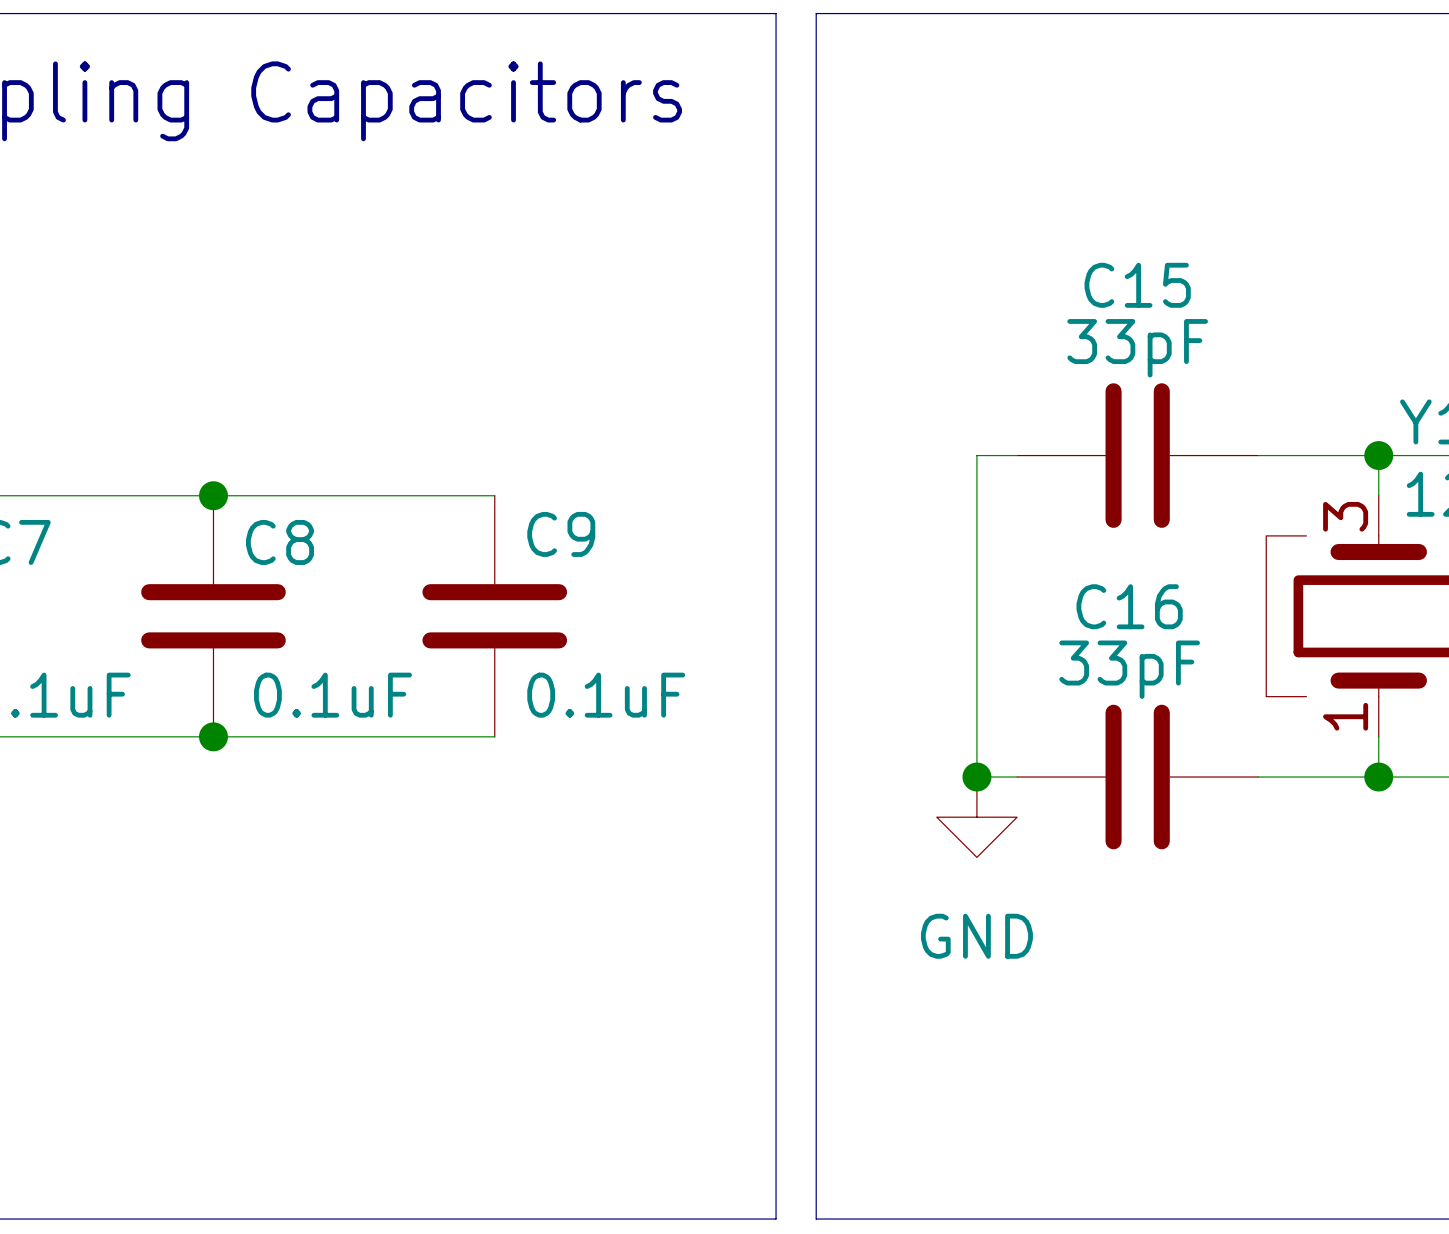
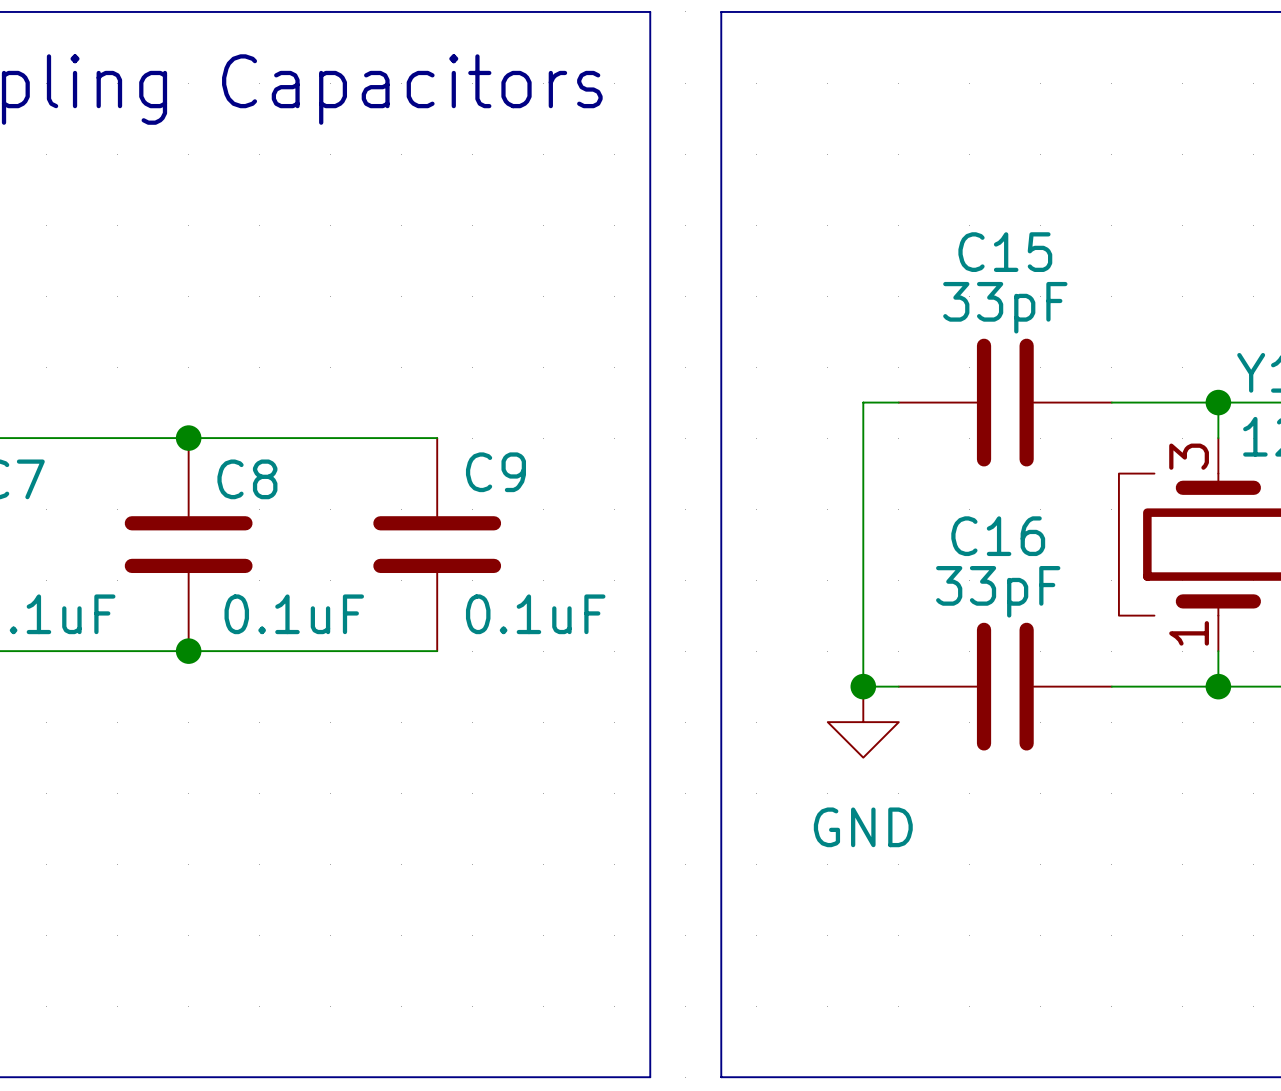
line: (735, 13) (776, 13) (776, 1219) (735, 1219) -> (650, 11) (650, 1077)

